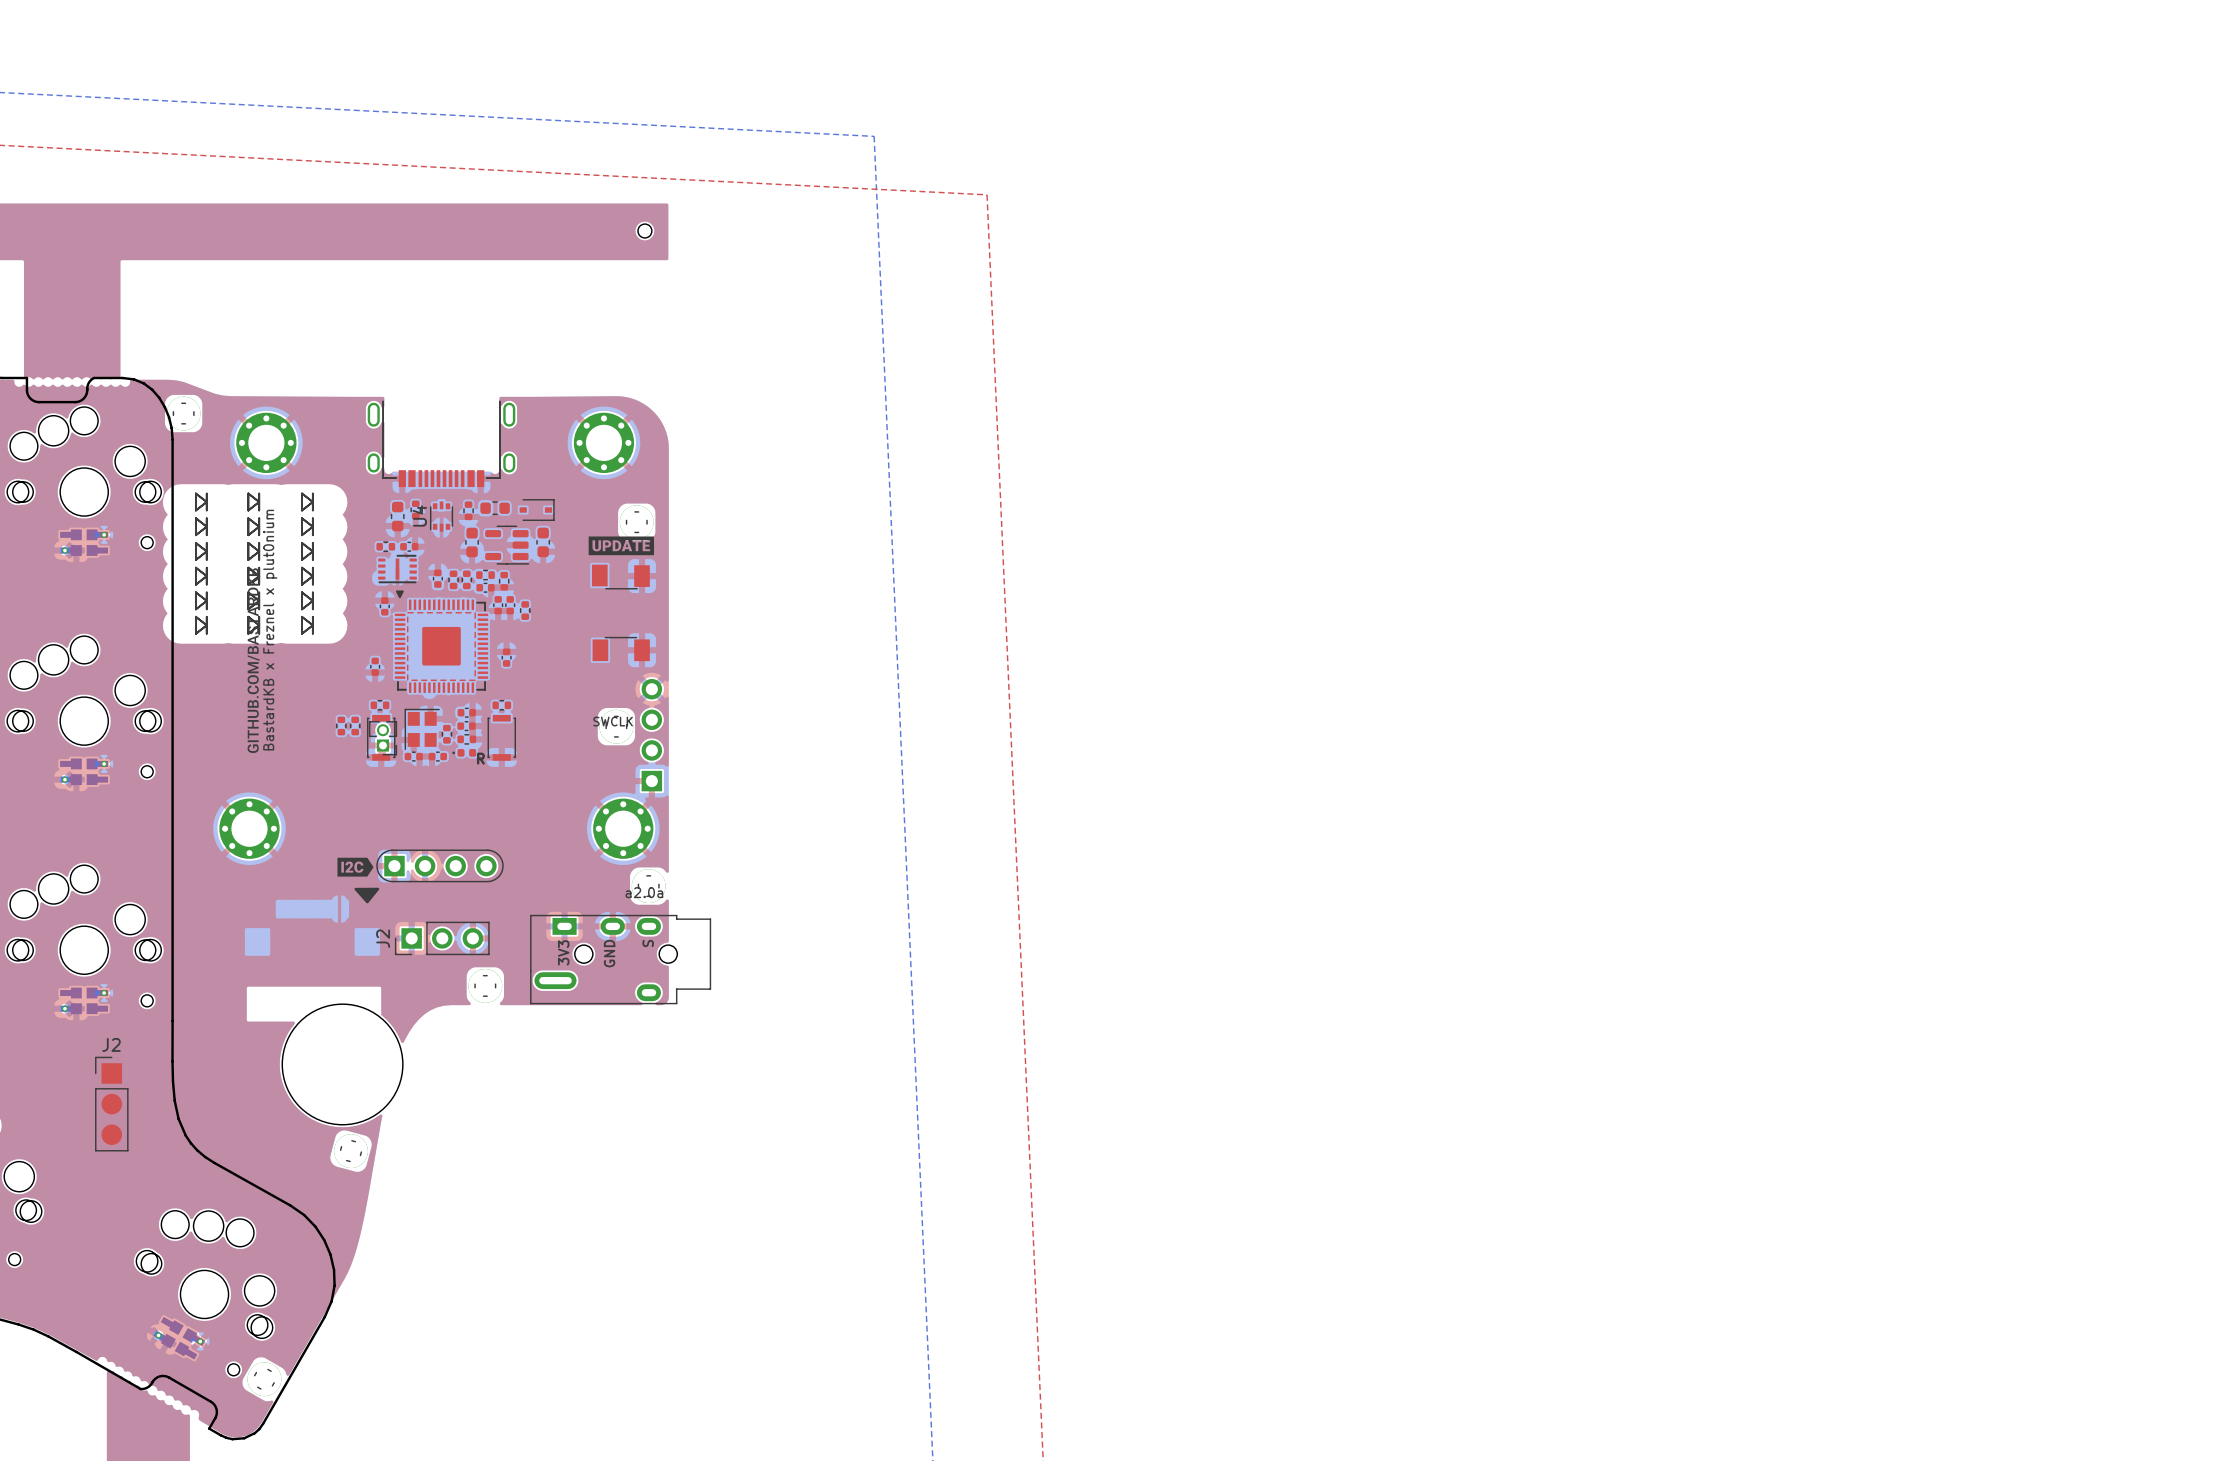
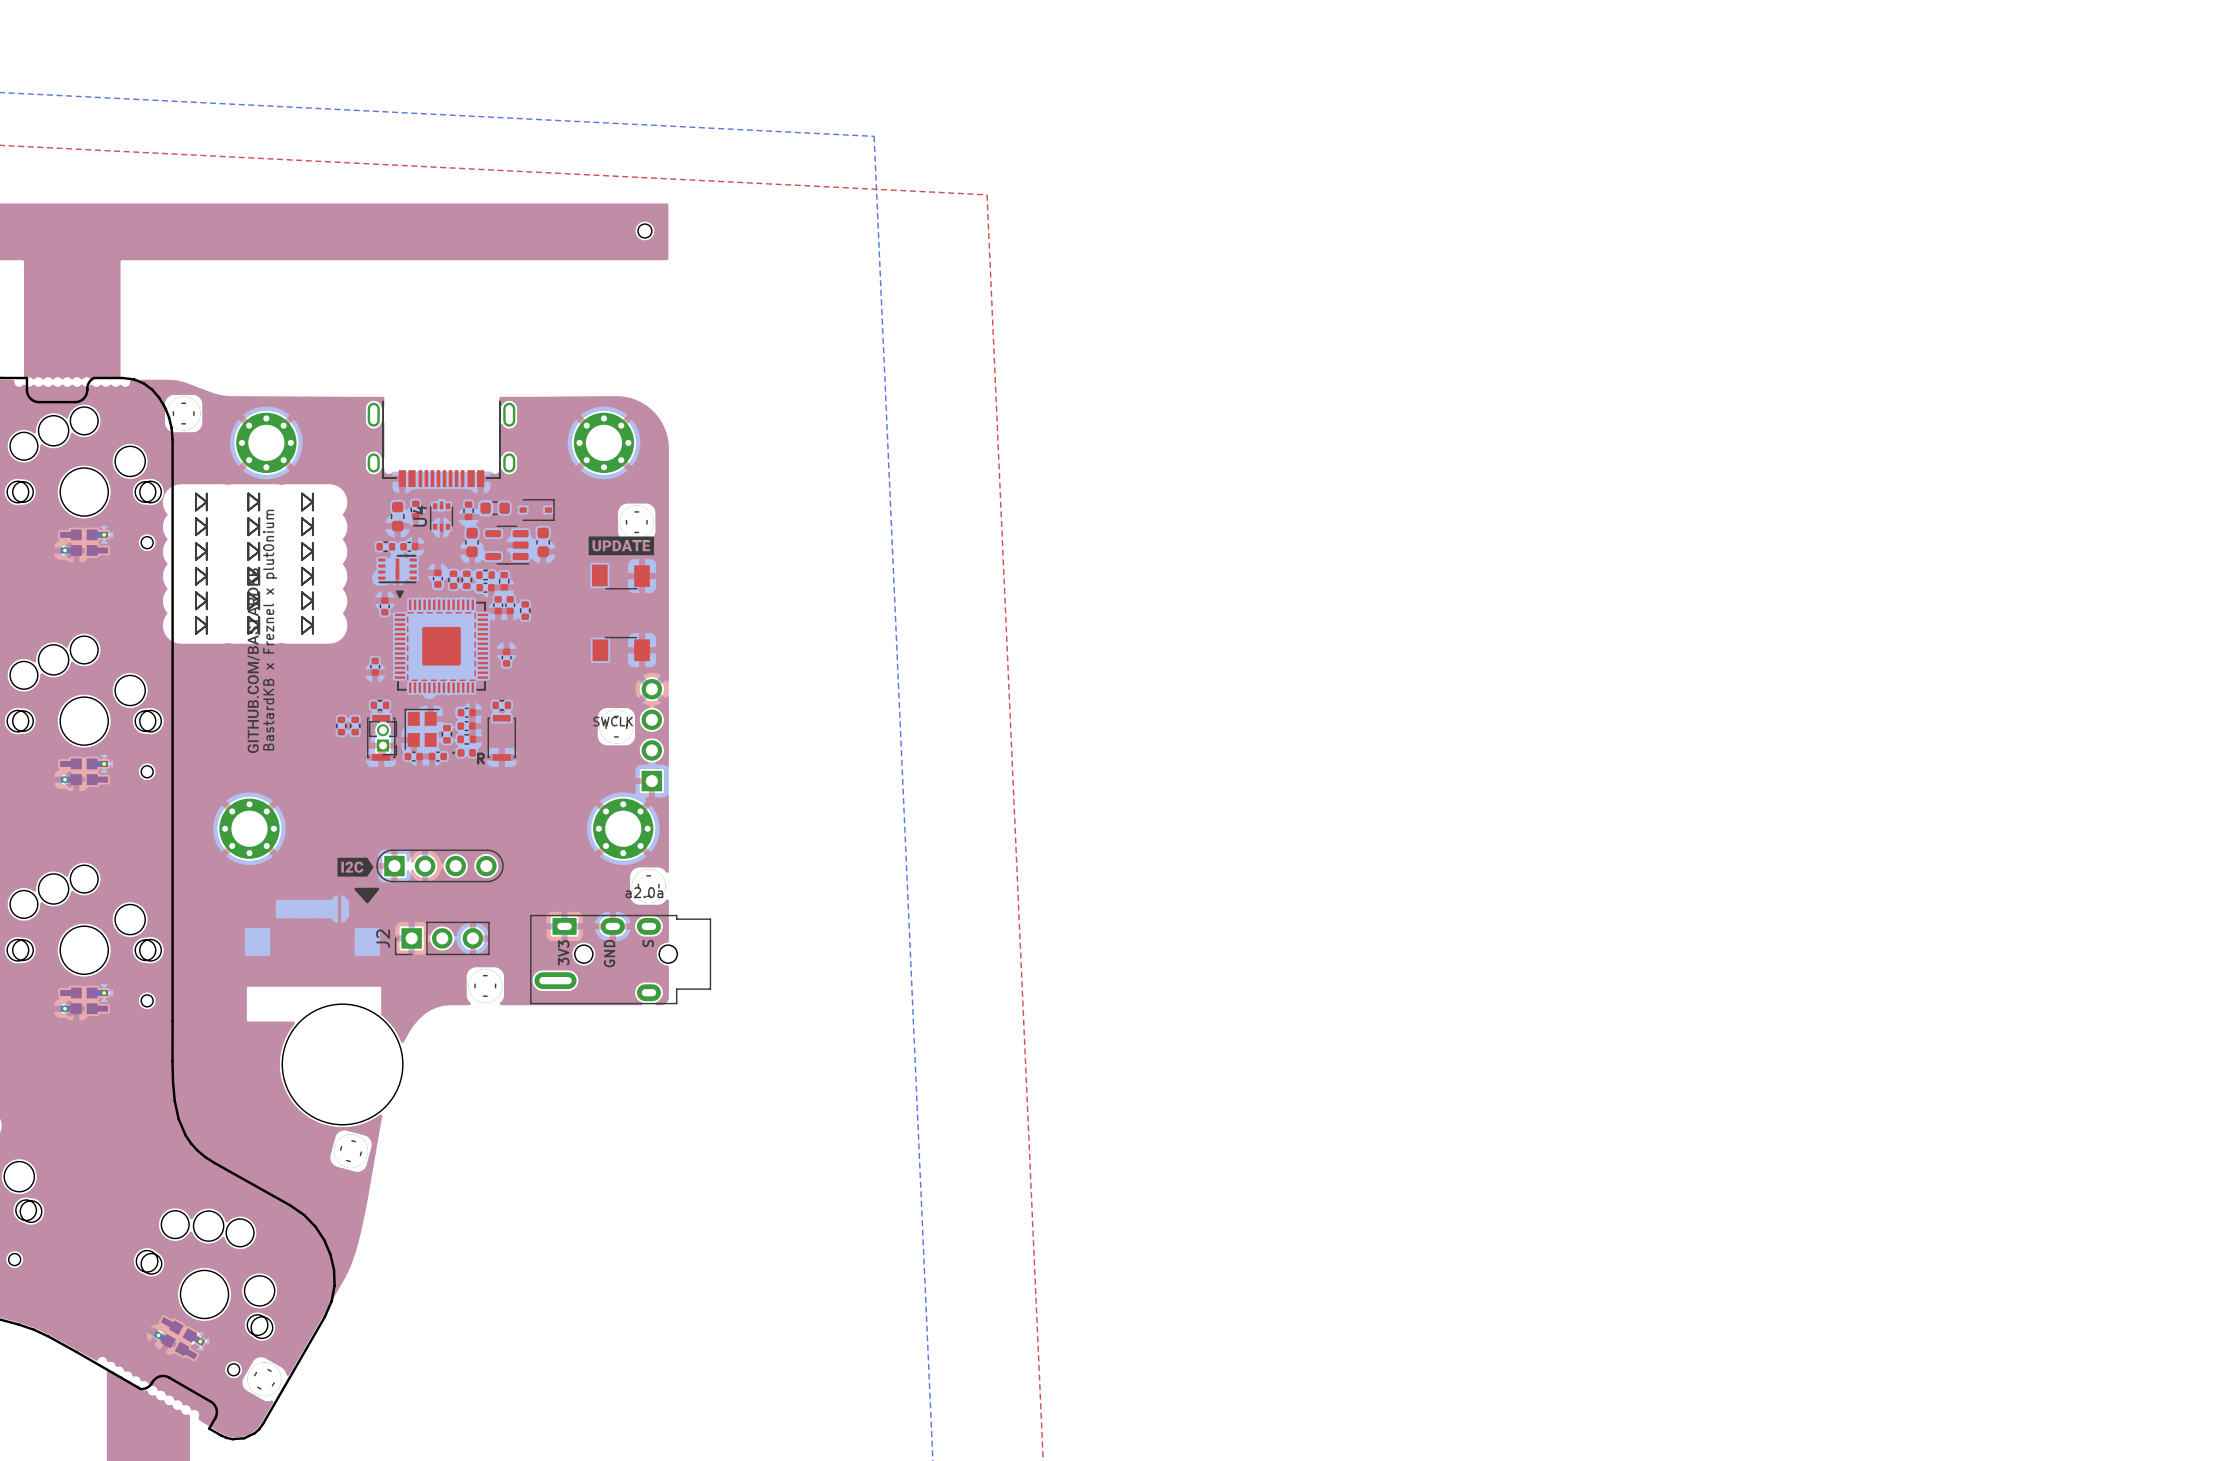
J2: (111, 1104) -> none

